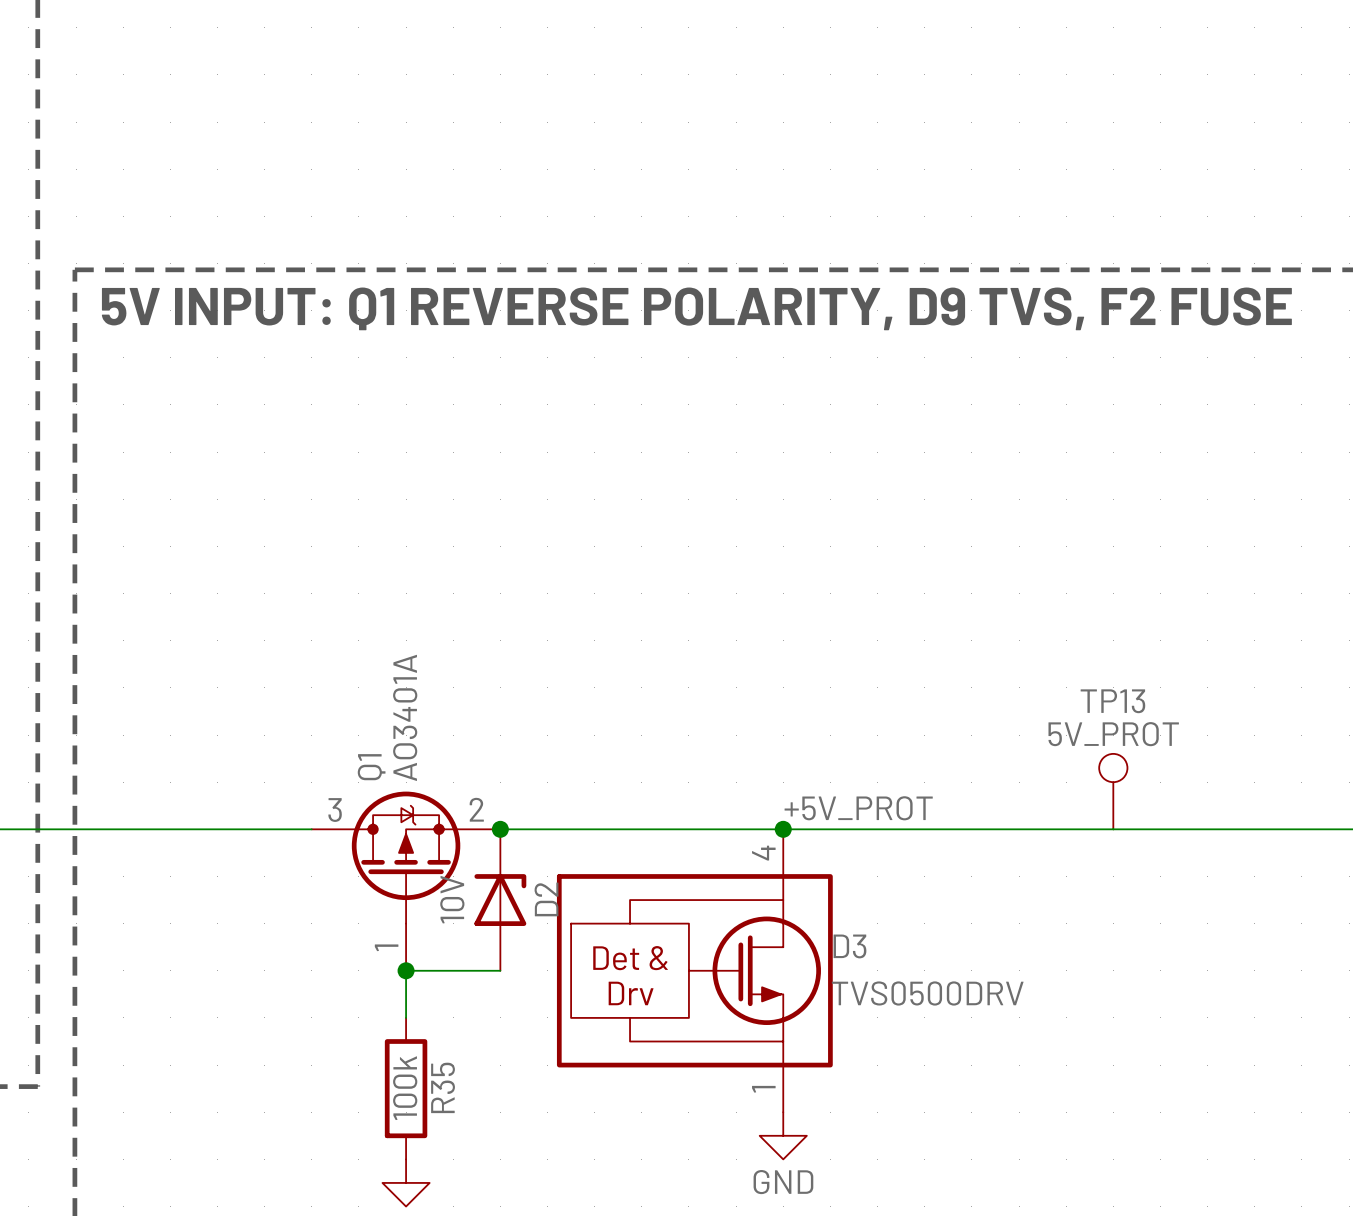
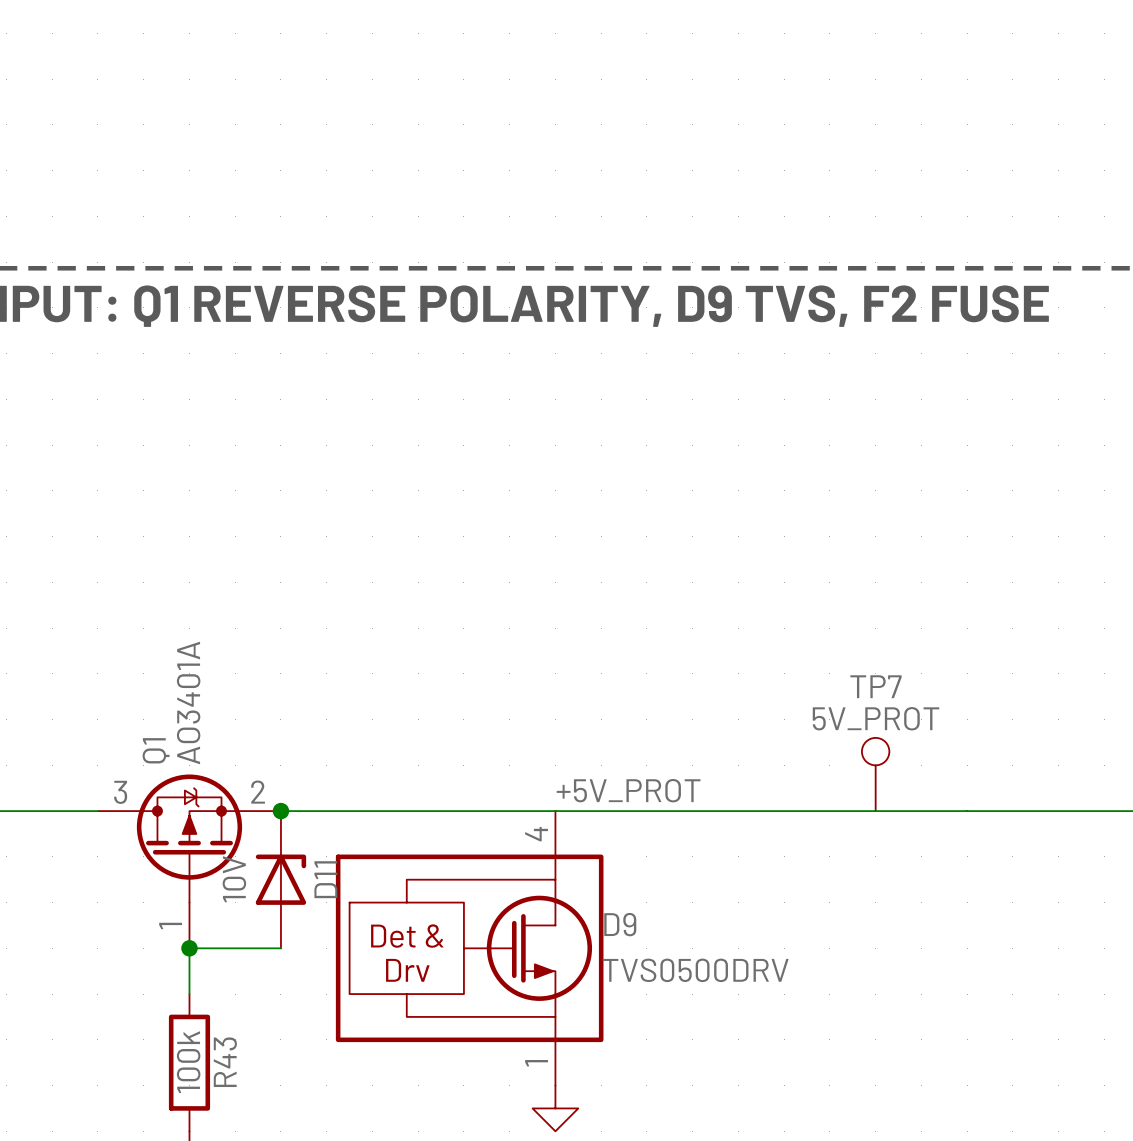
TP13 name: TP13 (1112, 701) -> TP7 (875, 686)
junction: (783, 829) -> none
D2 name: D2 (546, 899) -> D11 (325, 879)
D3 name: D3 (849, 946) -> D9 (620, 924)
R35 name: R35 (443, 1087) -> R43 (225, 1062)

